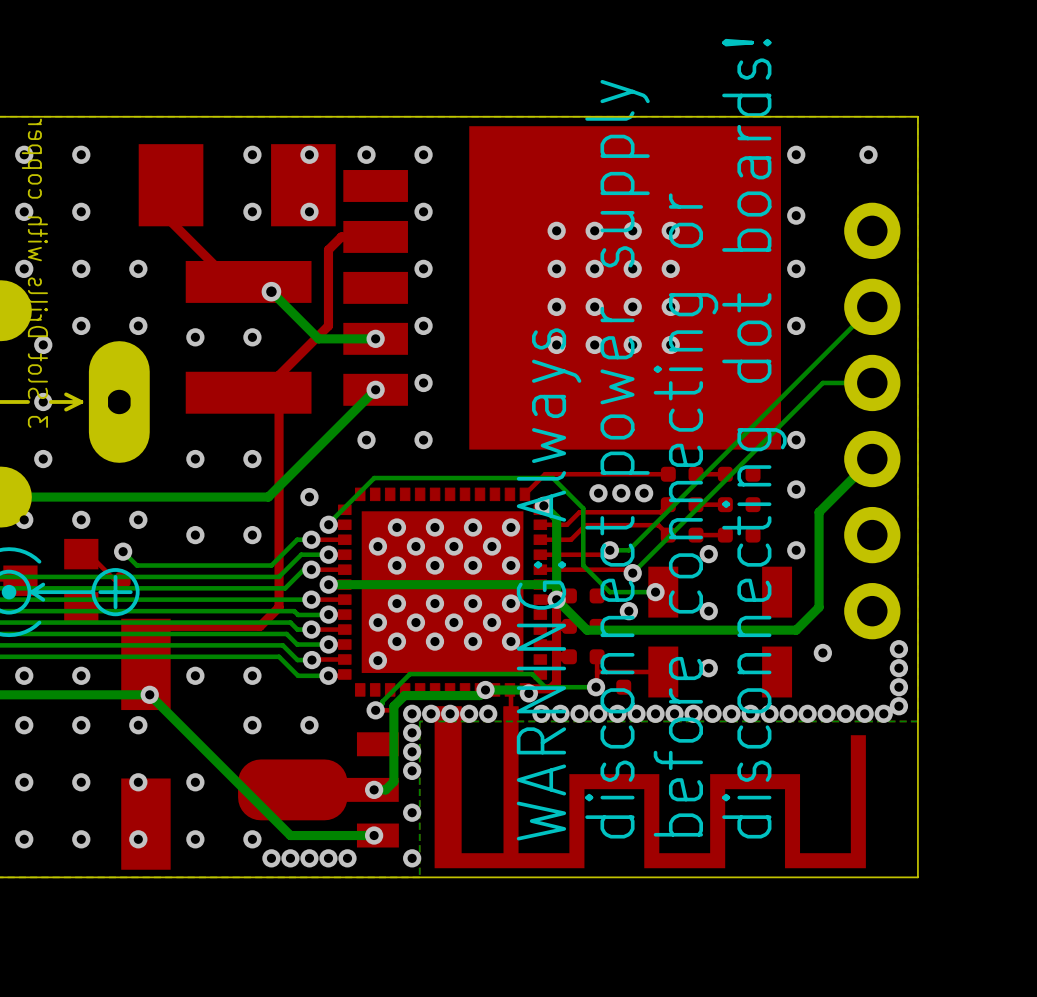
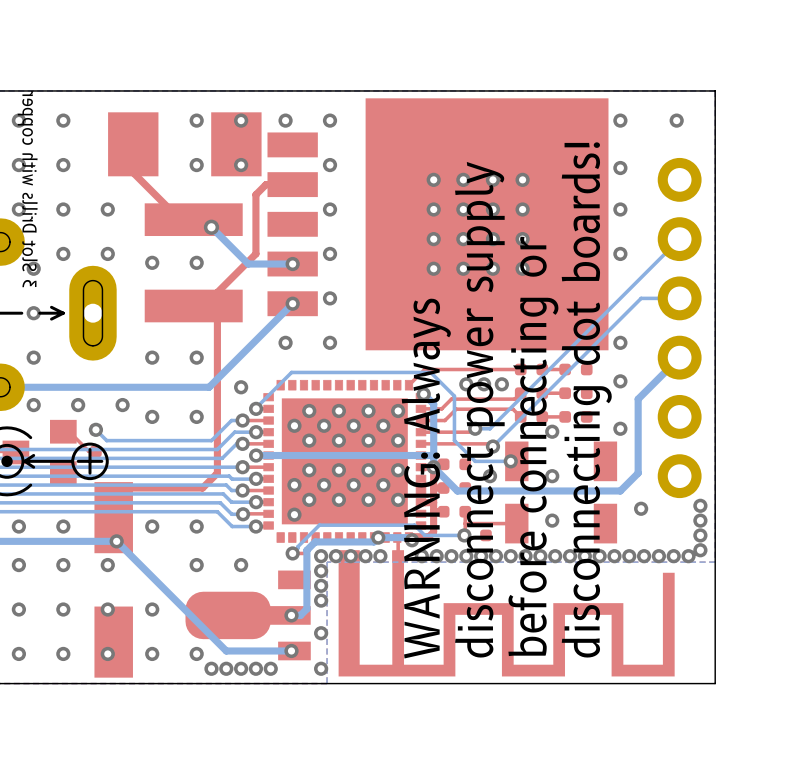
via: (24, 519) -> none
via: none -> (33, 405)
via: (81, 519) -> none
via: none -> (78, 405)
via: (138, 519) -> none
via: none -> (122, 405)

